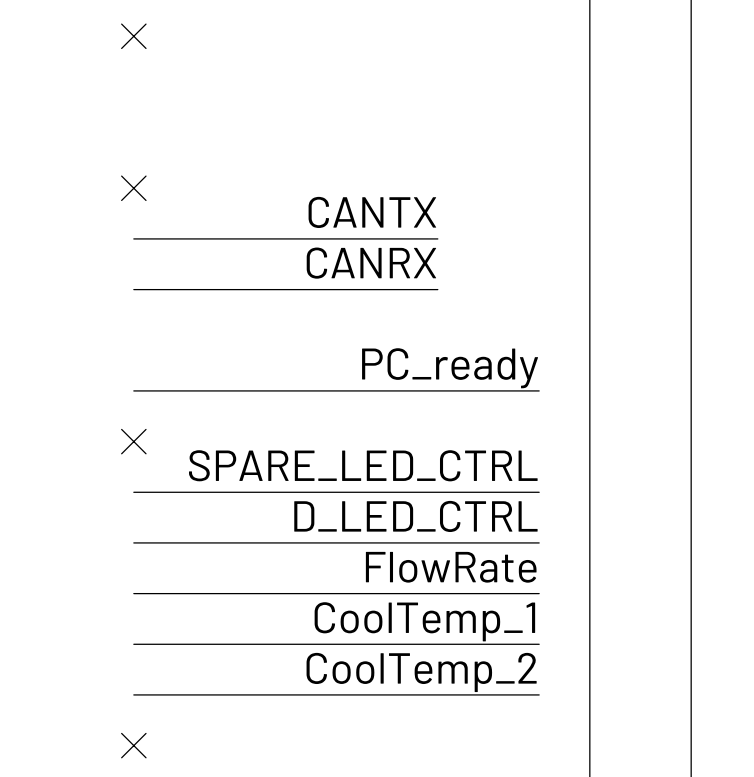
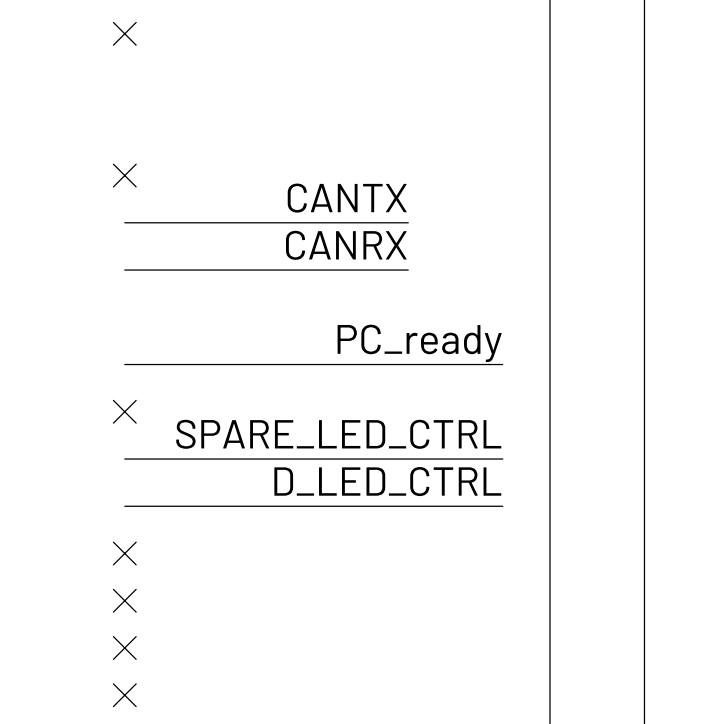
label: FlowRate (451, 567) -> none
wire: (133, 593) (539, 593) -> none
no-connect mark: none -> (124, 553)
label: CoolTemp_1 (424, 621) -> none
wire: (133, 644) (539, 644) -> none
no-connect mark: none -> (124, 600)
label: CoolTemp_2 (421, 672) -> none
wire: (133, 694) (539, 694) -> none
no-connect mark: none -> (124, 647)

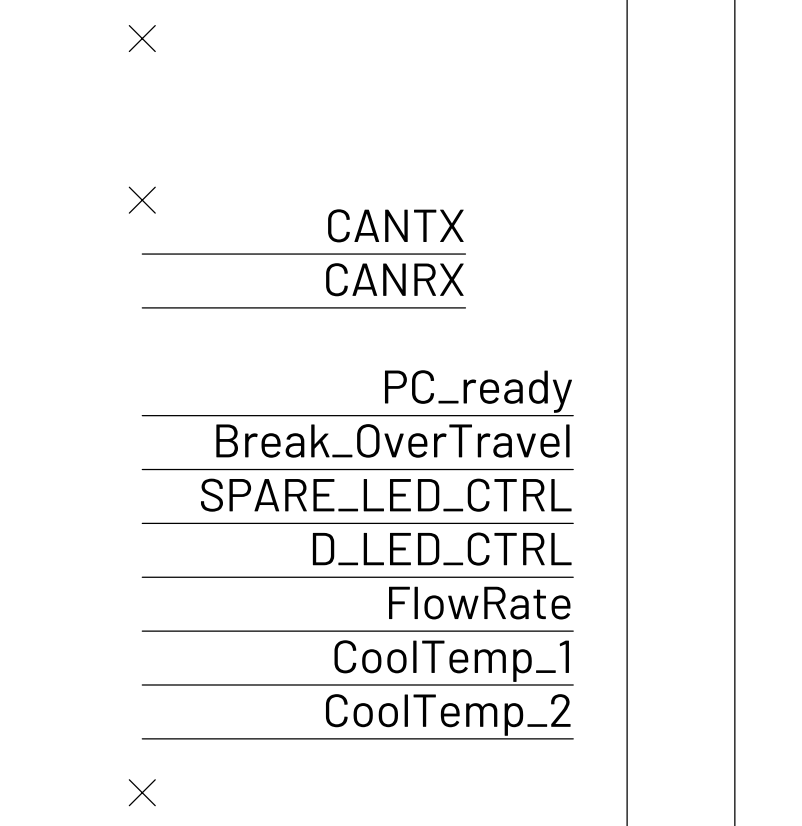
label: none -> Break_OverTravel (392, 440)
wire: none -> (142, 469) (573, 469)
no-connect mark: (124, 411) -> none
label: none -> FlowRate (479, 603)
wire: none -> (142, 631) (573, 631)
no-connect mark: (124, 553) -> none
label: none -> CoolTemp_1 (451, 661)
wire: none -> (142, 684) (573, 684)
no-connect mark: (124, 600) -> none
label: none -> CoolTemp_2 (448, 714)
wire: none -> (142, 738) (573, 738)
no-connect mark: (124, 647) -> none

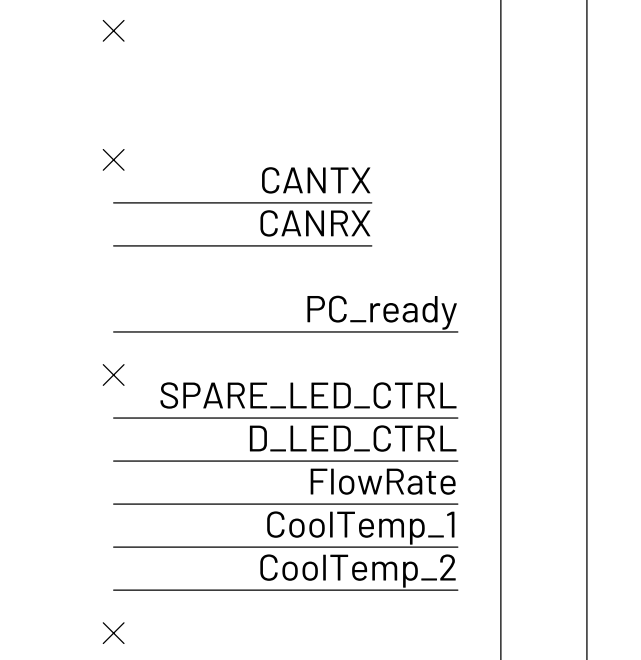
label: Break_OverTravel (392, 440) -> none
wire: (142, 469) (573, 469) -> none
no-connect mark: none -> (113, 375)

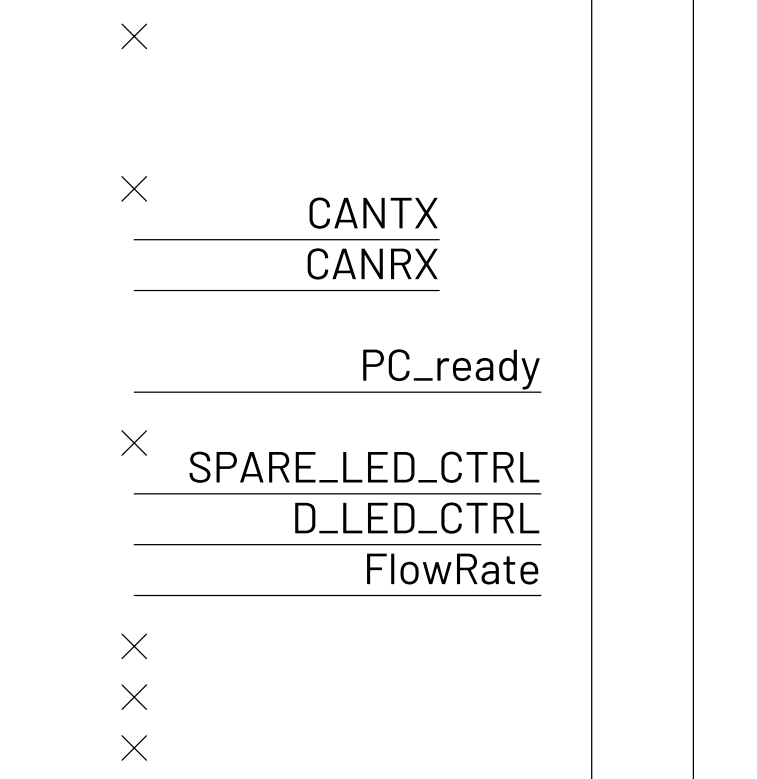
label: CoolTemp_1 (360, 528) -> none
wire: (113, 547) (457, 547) -> none
no-connect mark: none -> (134, 646)
label: CoolTemp_2 (358, 571) -> none
wire: (113, 590) (457, 590) -> none
no-connect mark: none -> (134, 697)

